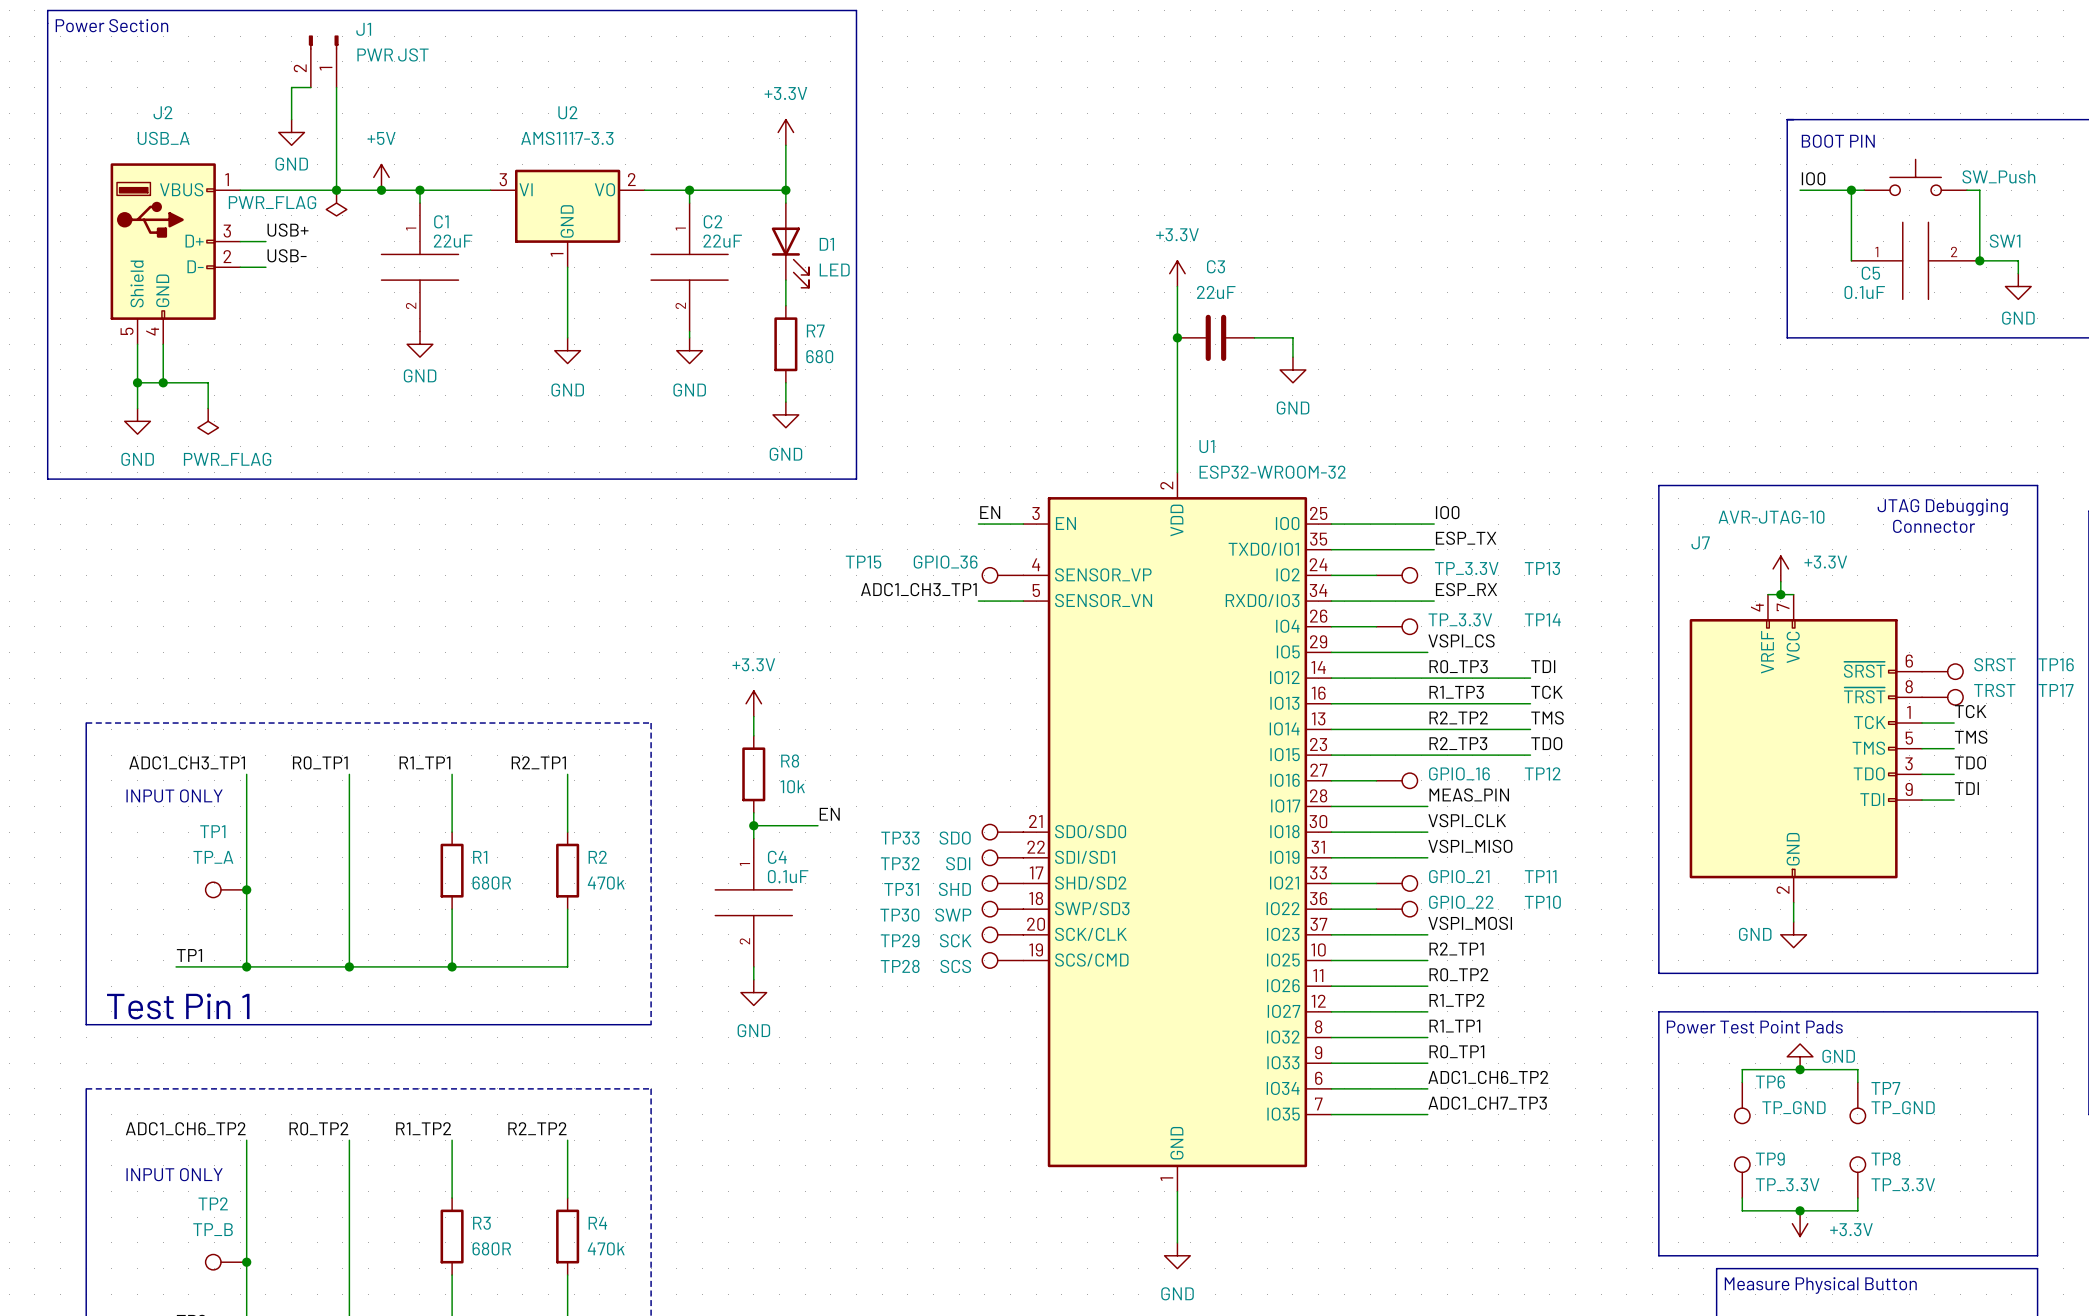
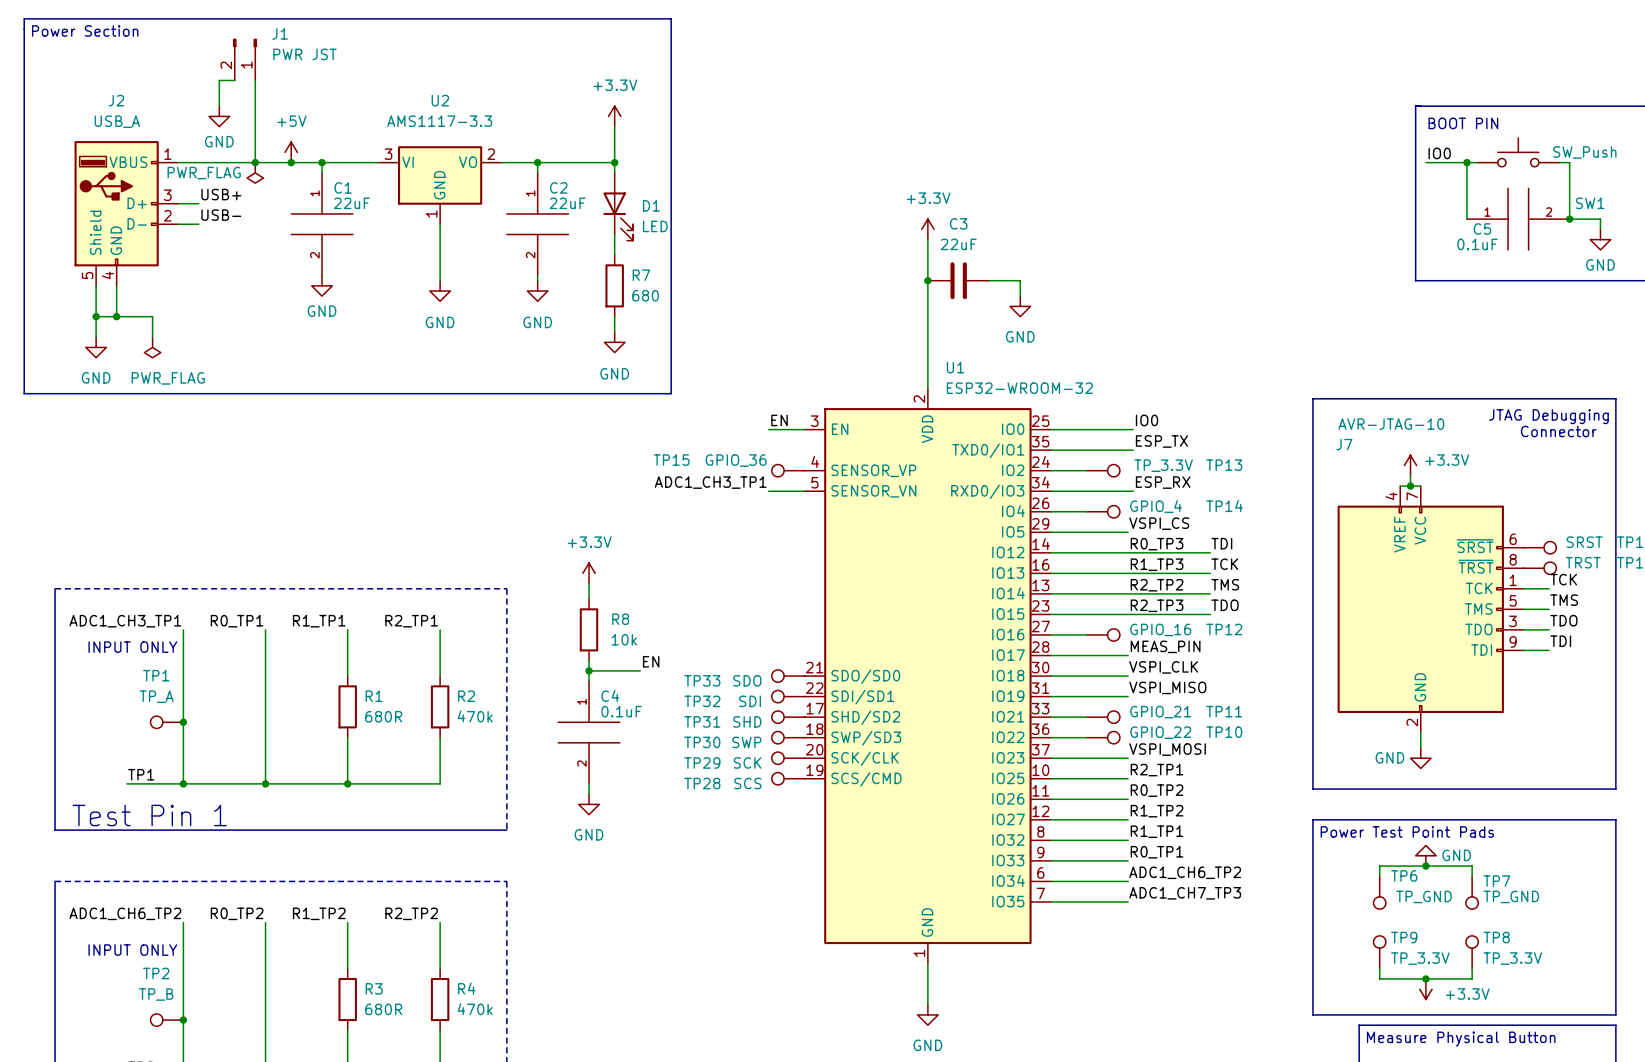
TP14 value: TP_3.3V (1460, 619) -> GPIO_4 (1156, 506)

